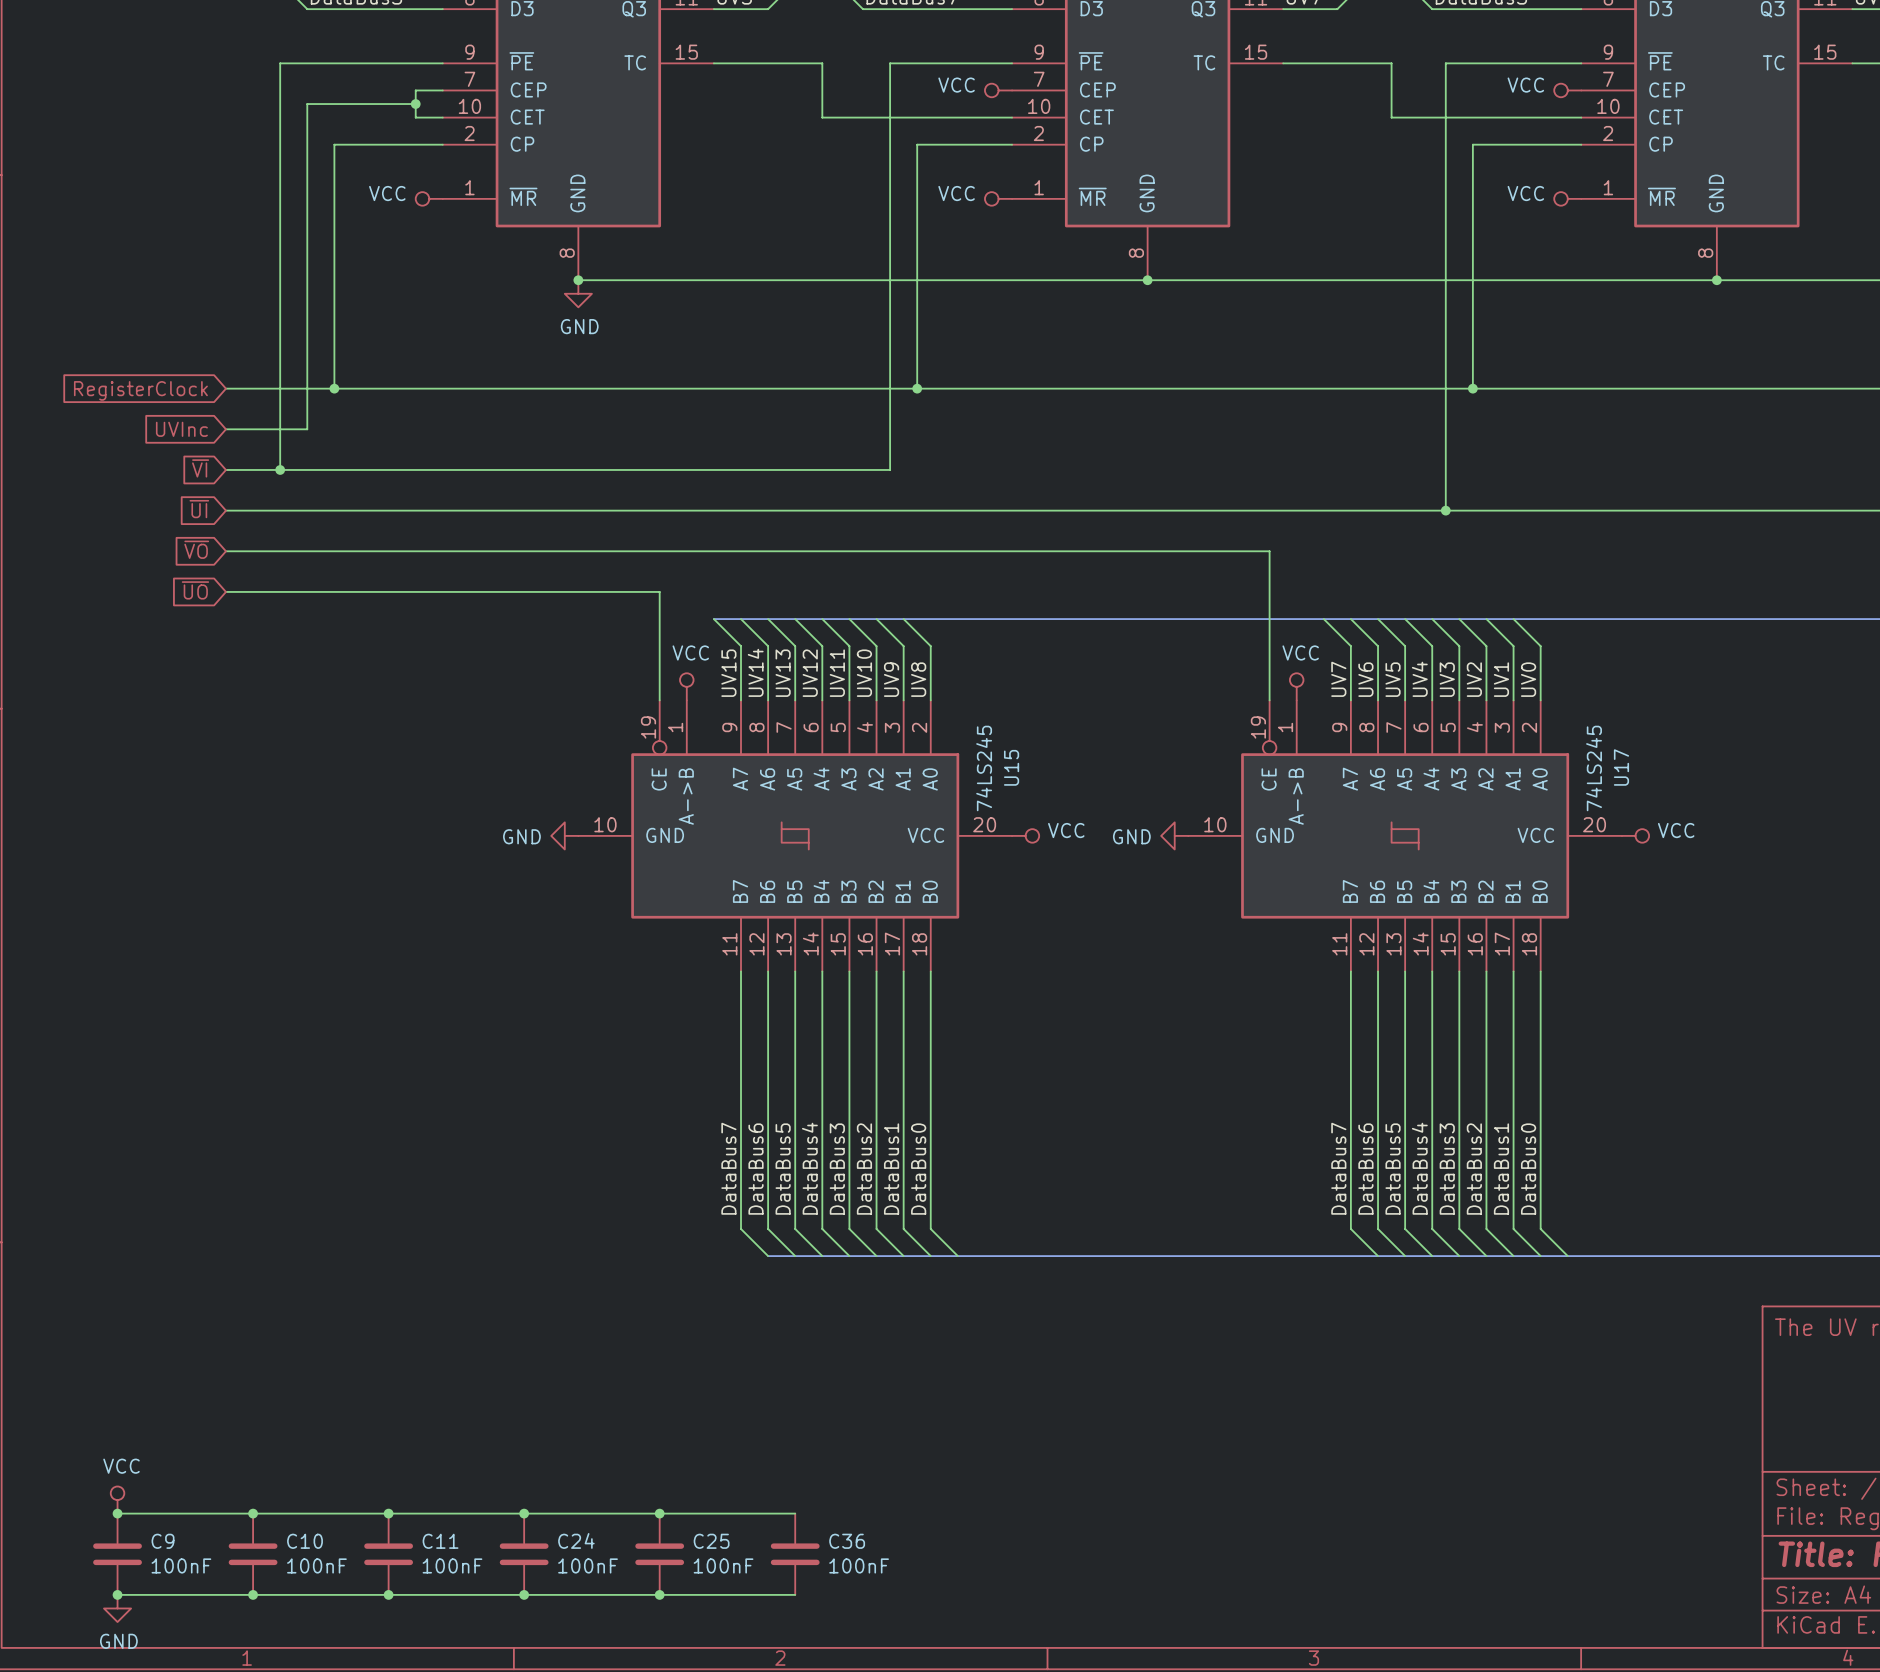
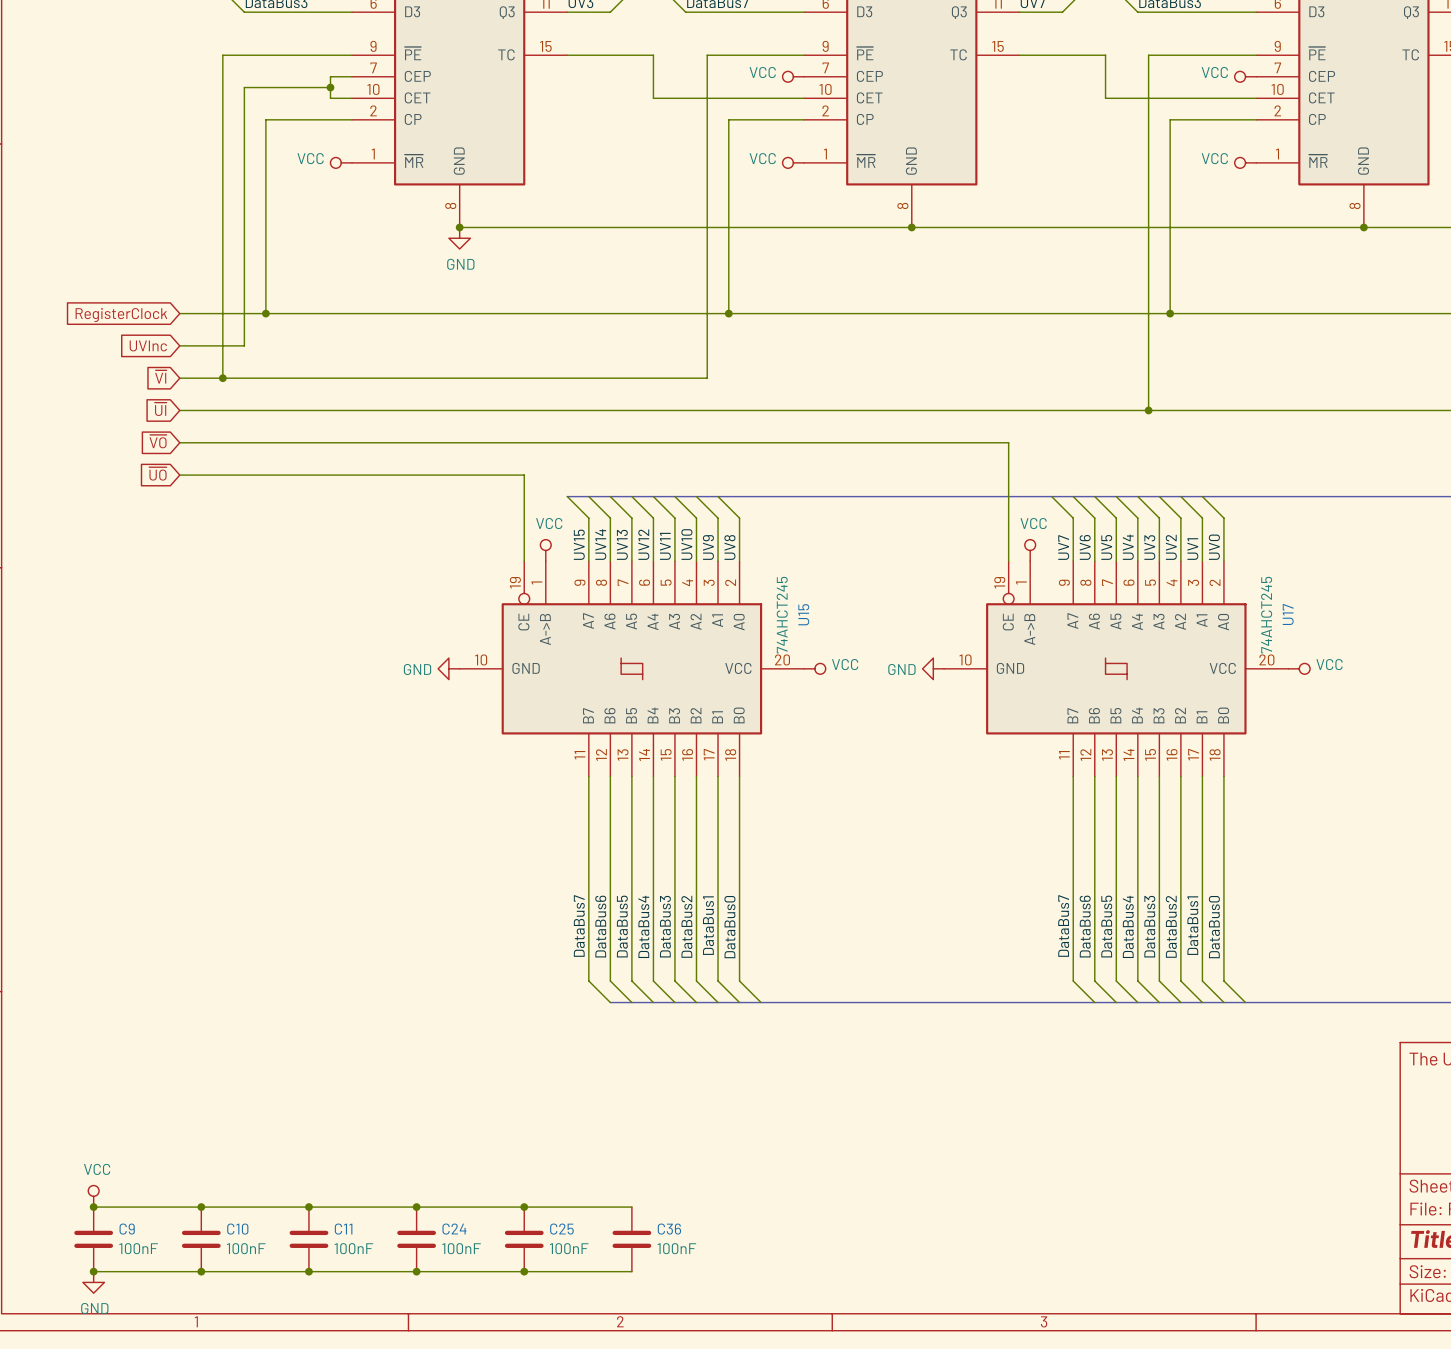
U15 value: 74LS245 (984, 768) -> 74AHCT245 (782, 615)
U17 value: 74LS245 (1594, 768) -> 74AHCT245 (1266, 615)

